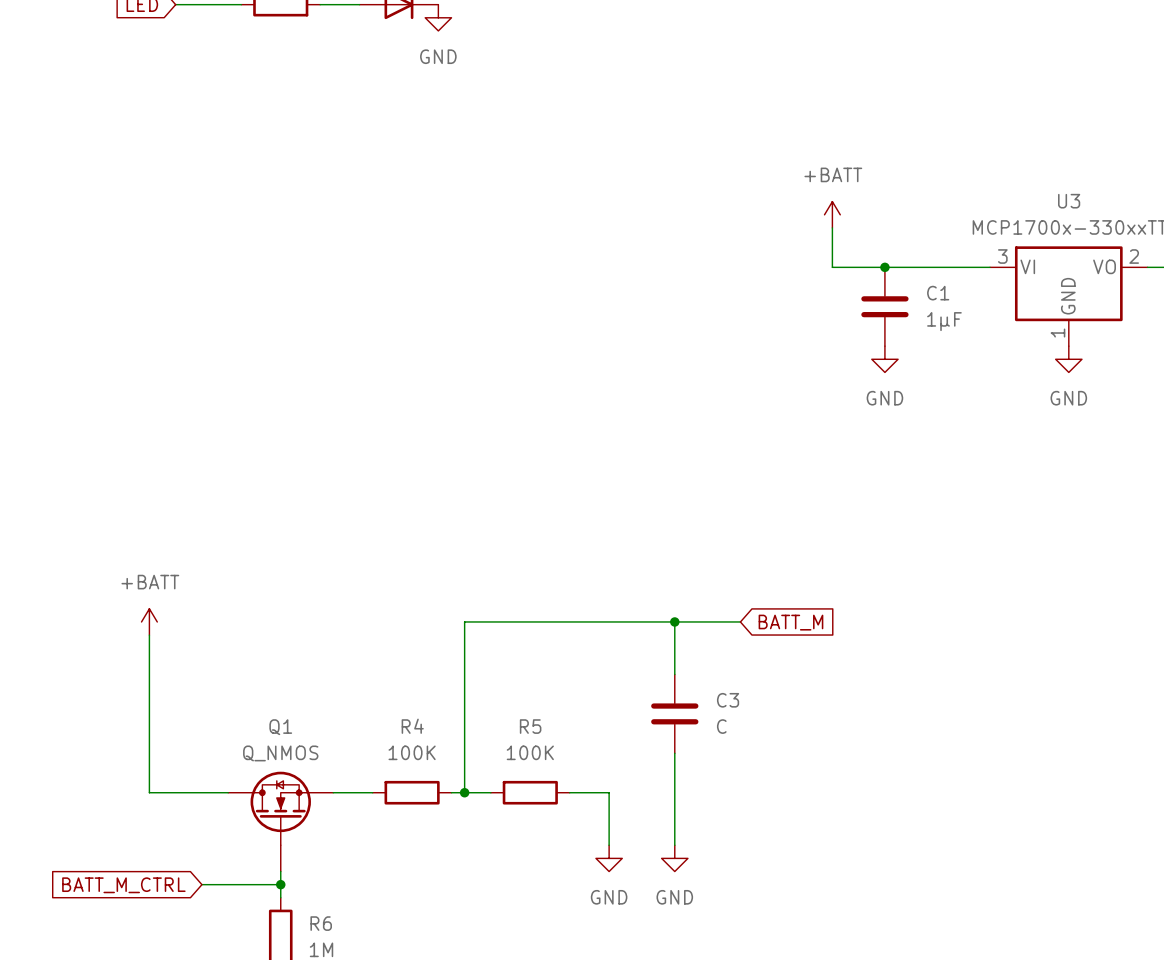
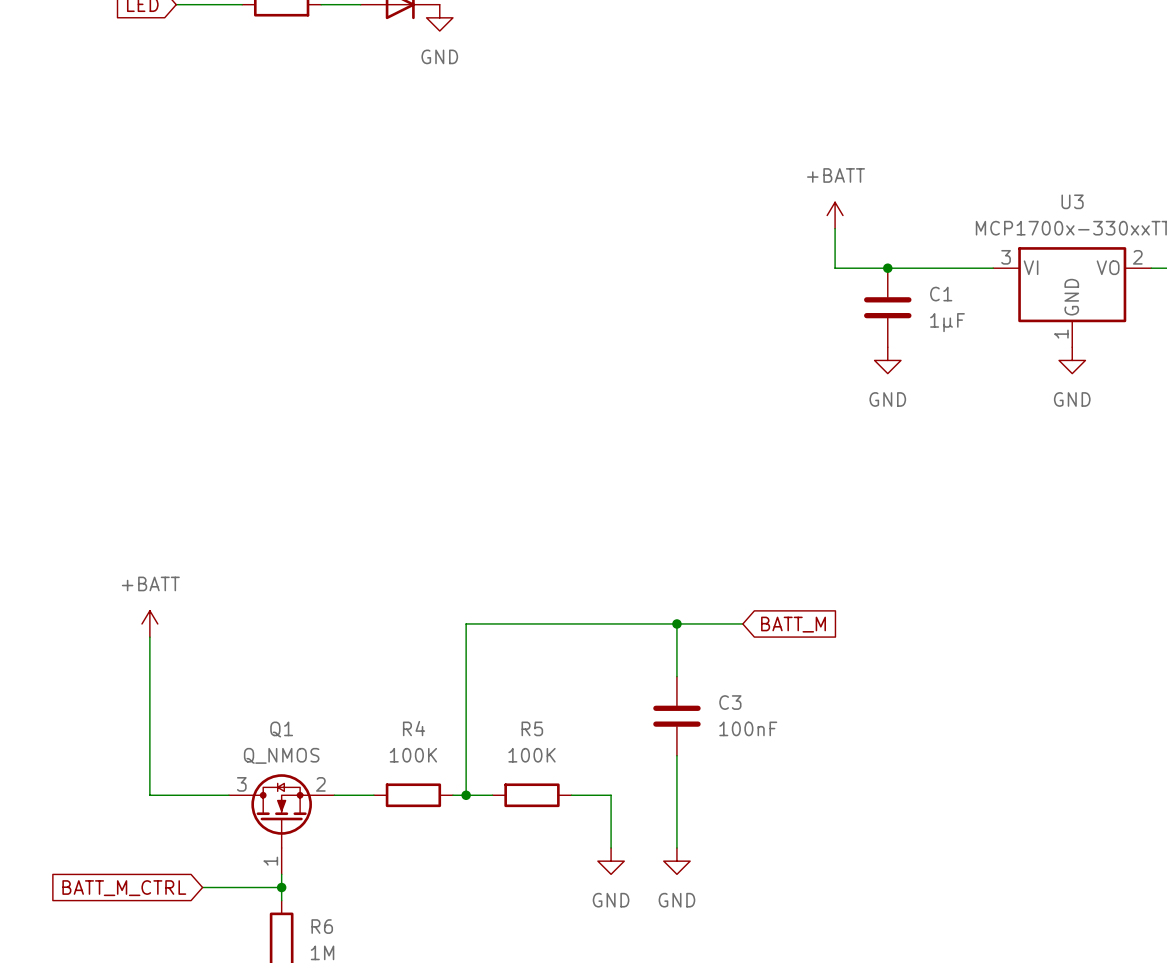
C3 value: C (721, 726) -> 100nF (748, 728)
Q1 pin number: none -> 3 (241, 784)
Q1 pin number: none -> 2 (320, 784)
Q1 pin number: none -> 1 (270, 861)

